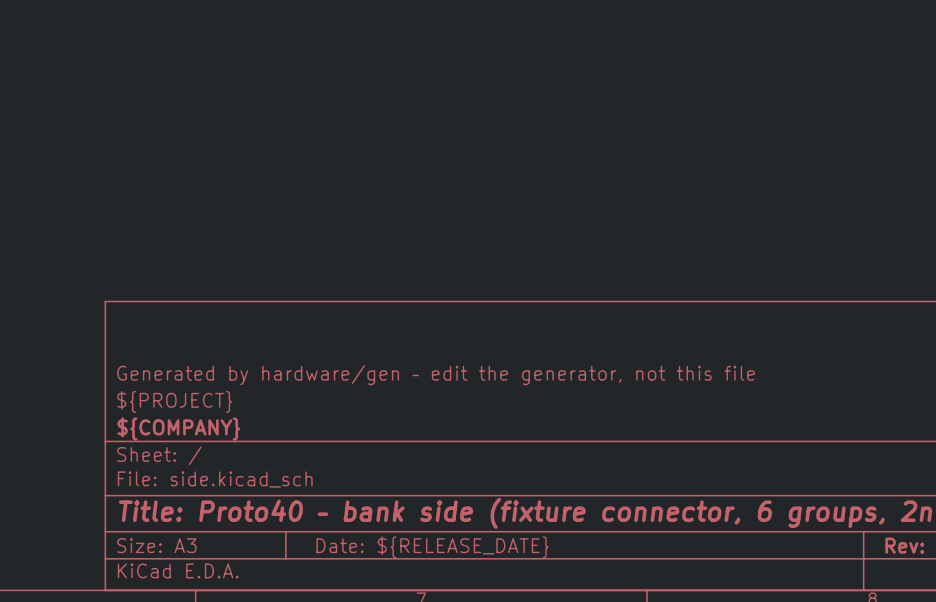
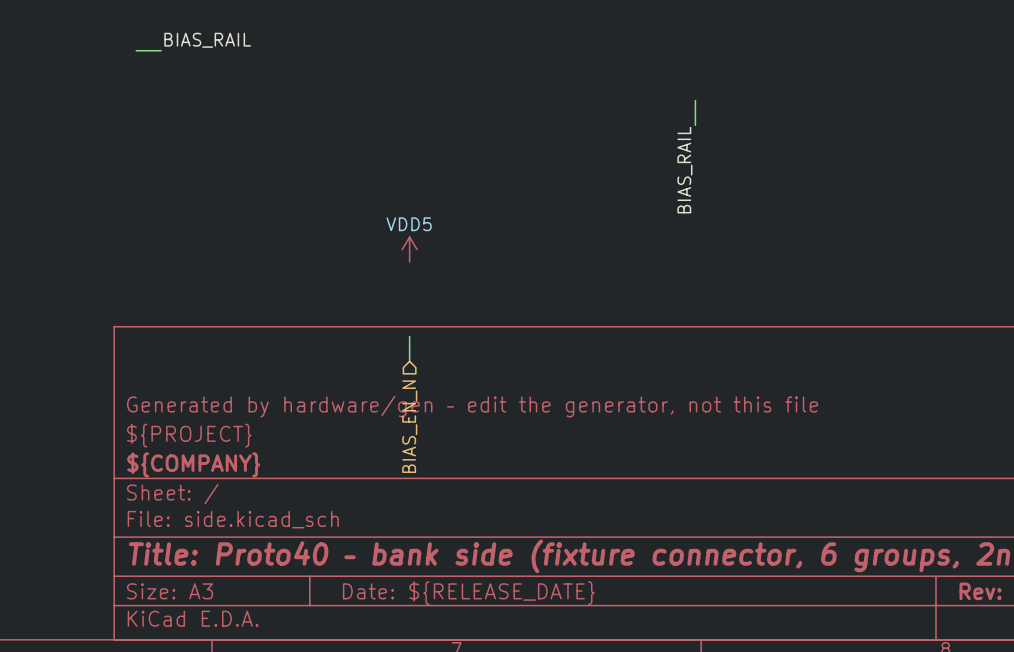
label: none -> BIAS_RAIL (207, 40)
wire: none -> (136, 50) (161, 50)
wire: none -> (695, 100) (695, 125)
label: none -> BIAS_RAIL (684, 170)
power symbol: none -> VDD5 (409, 249)
wire: none -> (409, 336) (409, 361)
hierarchical label: none -> BIAS_EN_N (409, 426)

